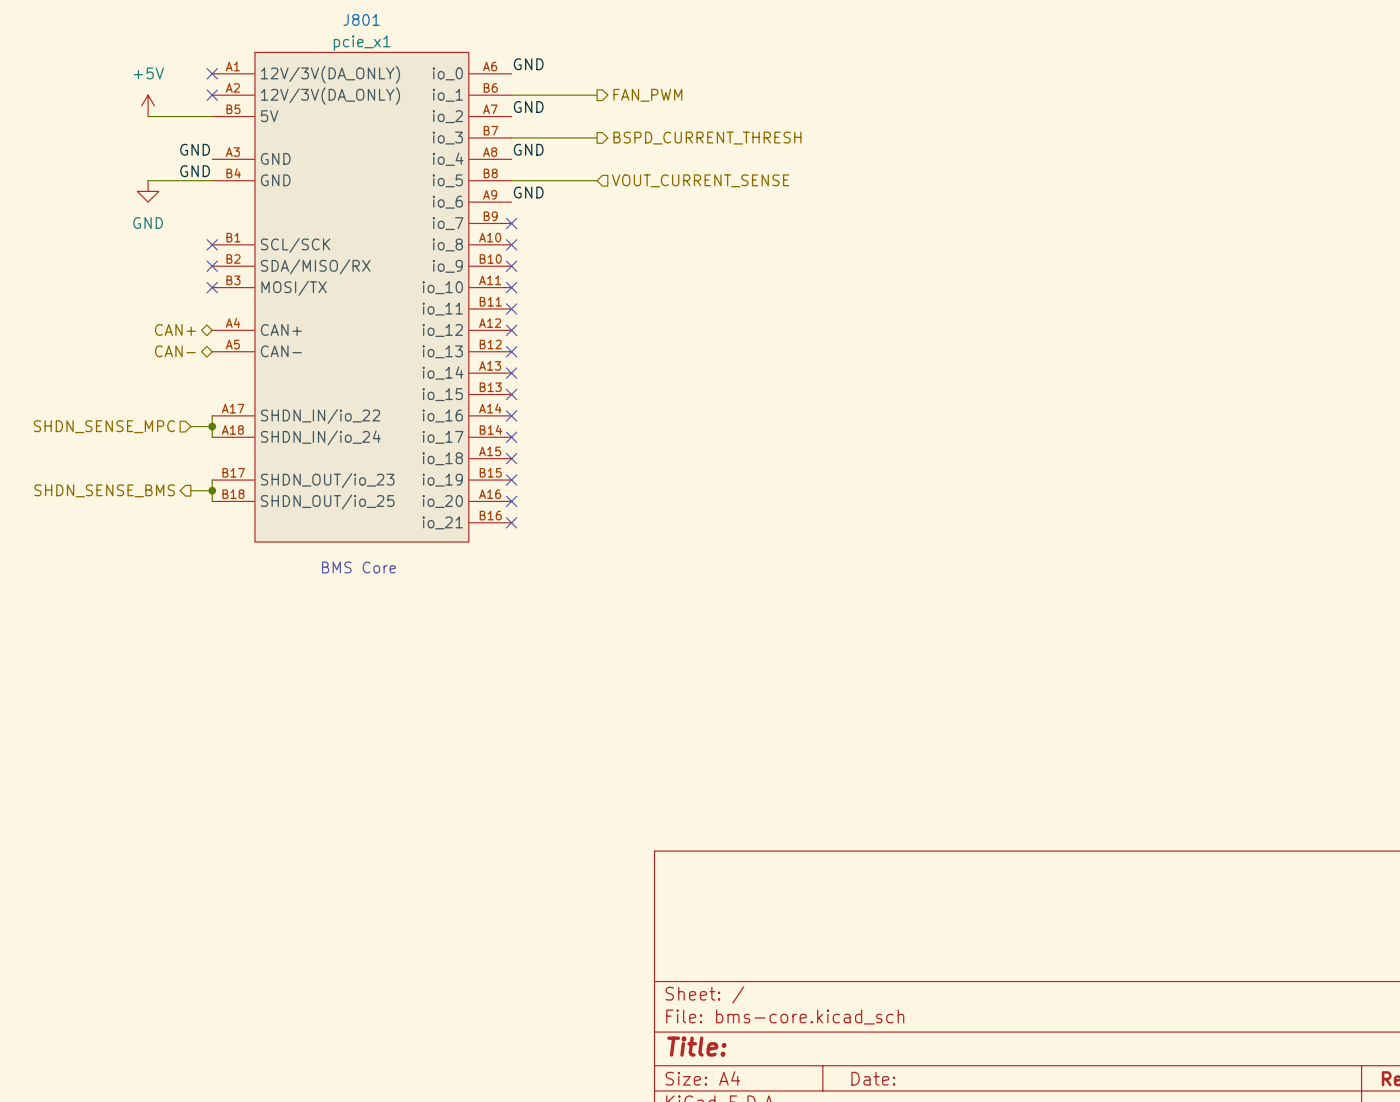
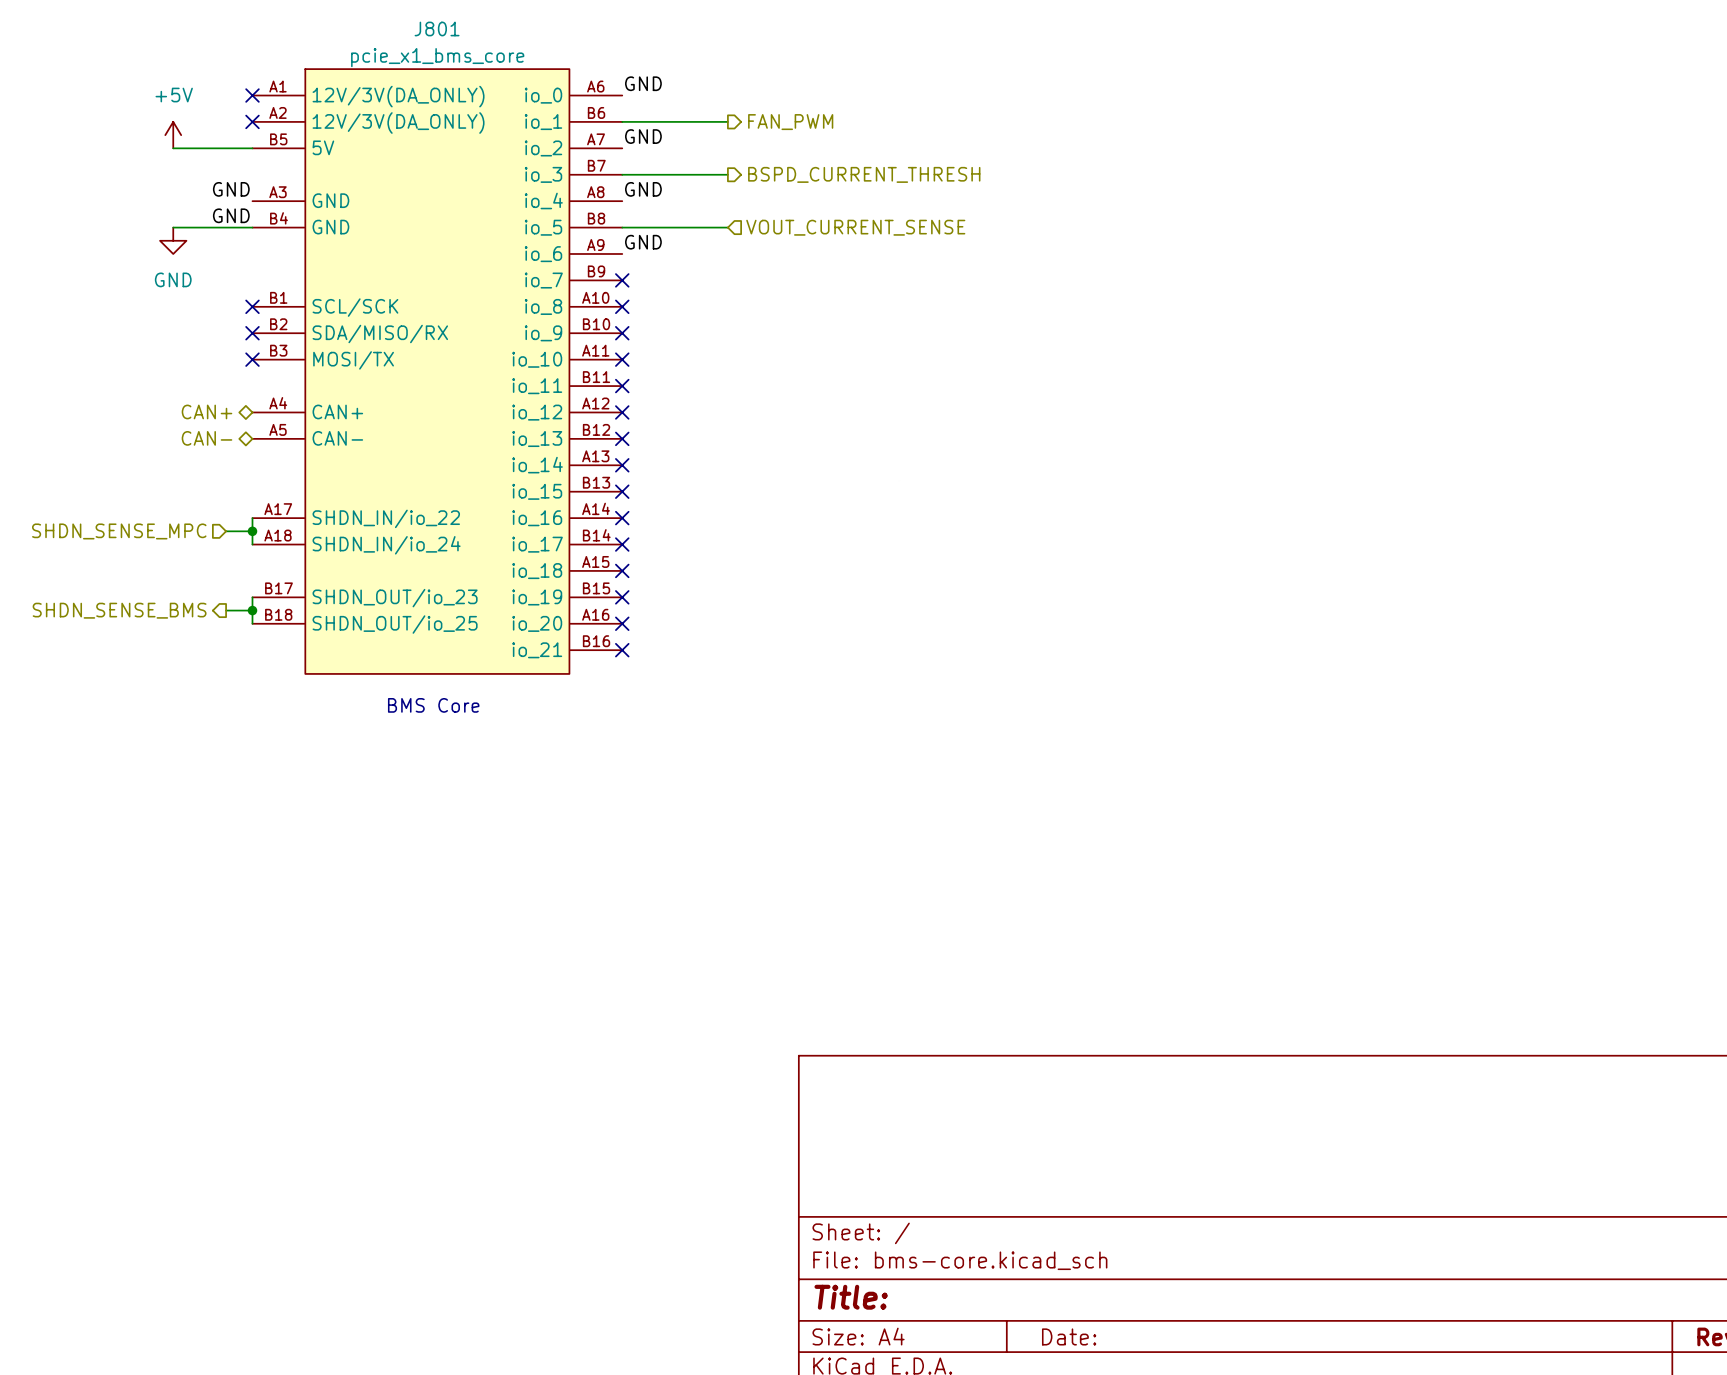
J801 value: pcie_x1 (362, 43) -> pcie_x1_bms_core (437, 57)

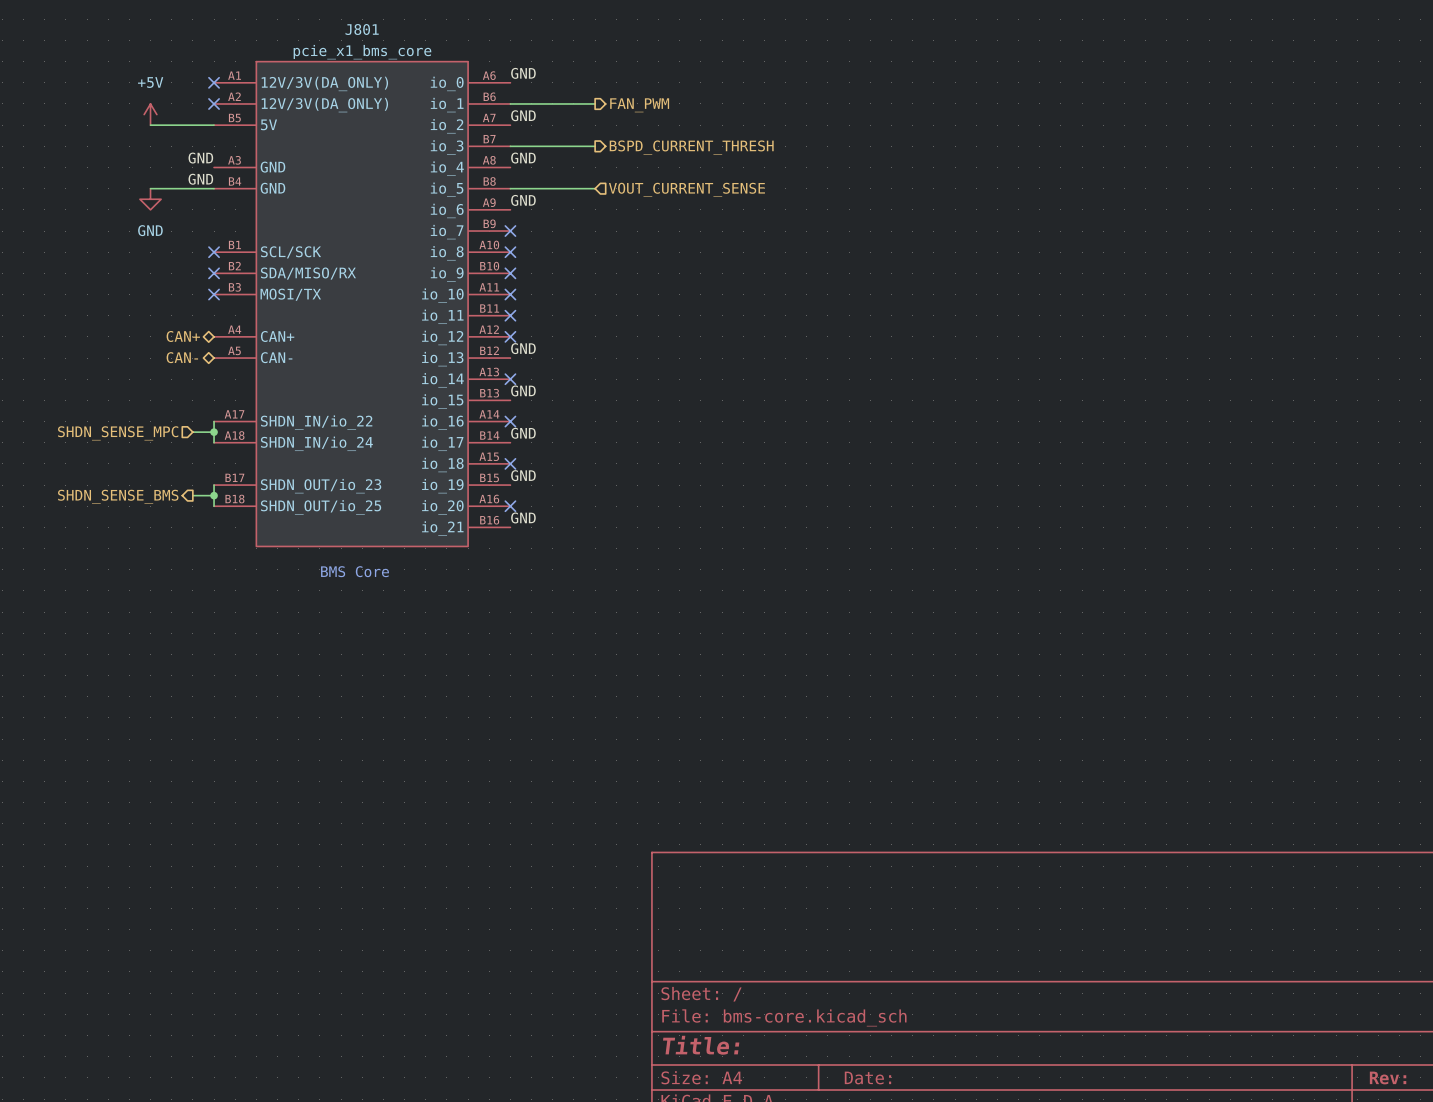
label: none -> GND (523, 348)
no-connect mark: (622, 438) -> none
label: none -> GND (523, 390)
no-connect mark: (622, 491) -> none
label: none -> GND (523, 433)
no-connect mark: (622, 544) -> none
label: none -> GND (523, 475)
no-connect mark: (622, 597) -> none
label: none -> GND (523, 517)
no-connect mark: (622, 650) -> none

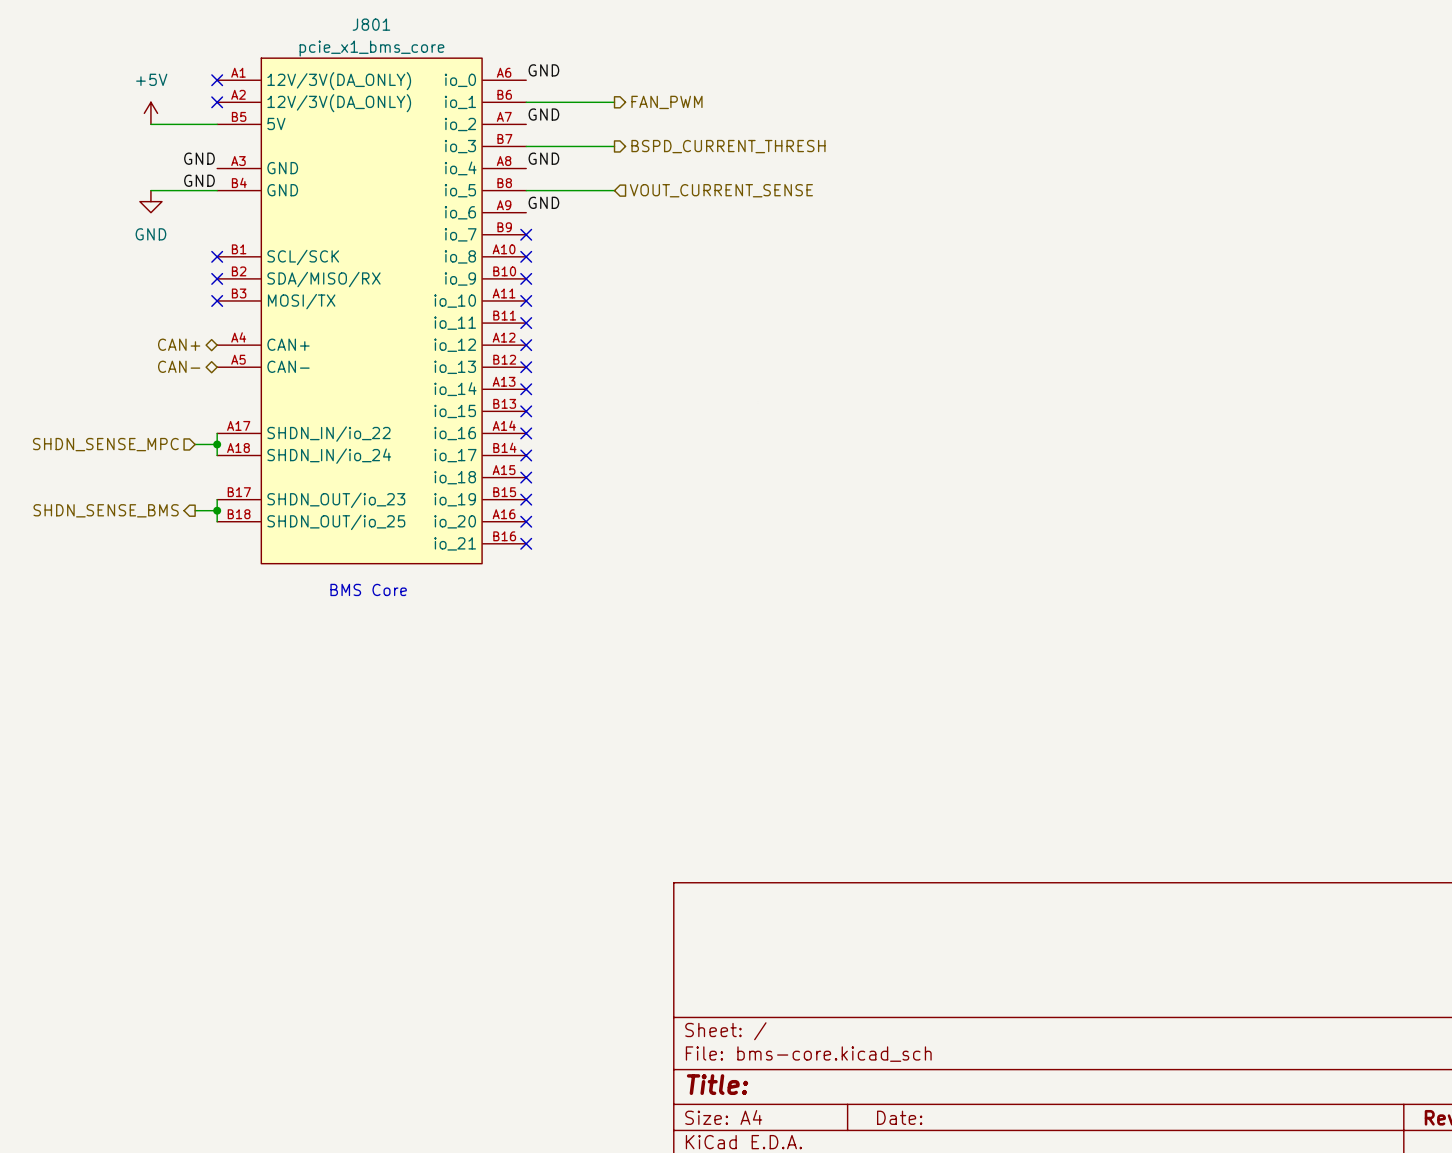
label: GND (523, 348) -> none
no-connect mark: none -> (526, 367)
label: GND (523, 390) -> none
no-connect mark: none -> (526, 411)
label: GND (523, 433) -> none
no-connect mark: none -> (526, 455)
label: GND (523, 475) -> none
no-connect mark: none -> (526, 499)
label: GND (523, 517) -> none
no-connect mark: none -> (526, 543)

